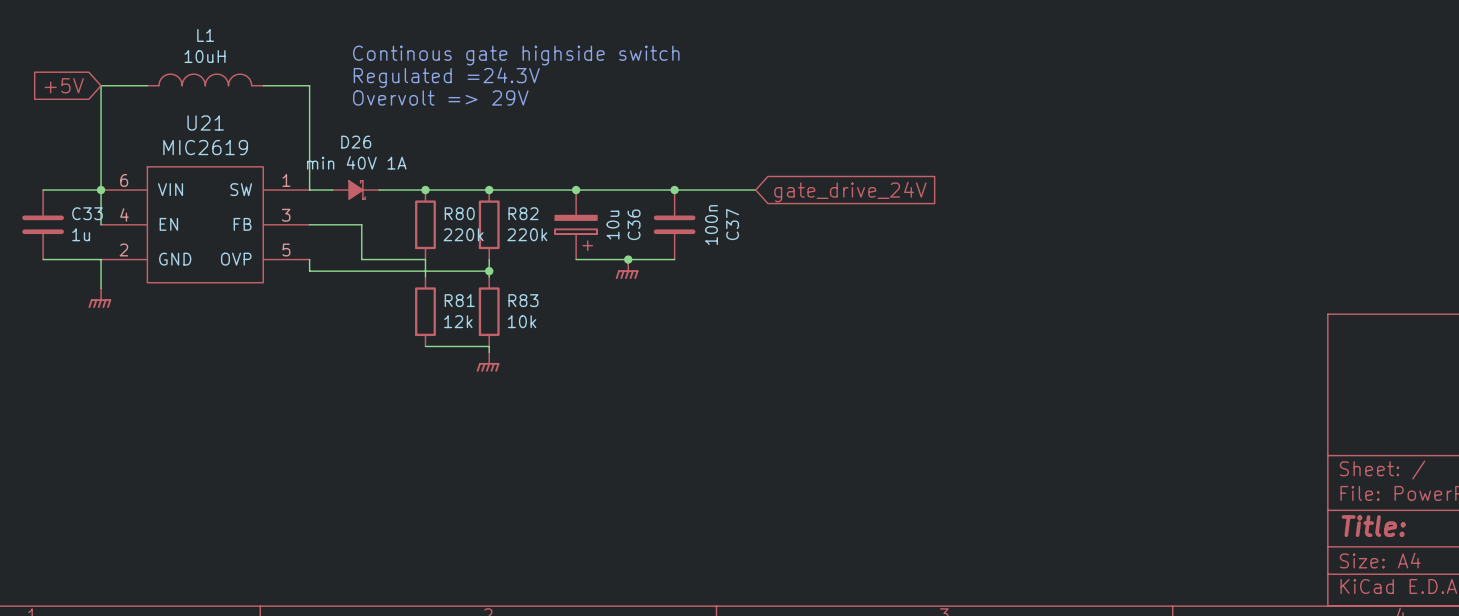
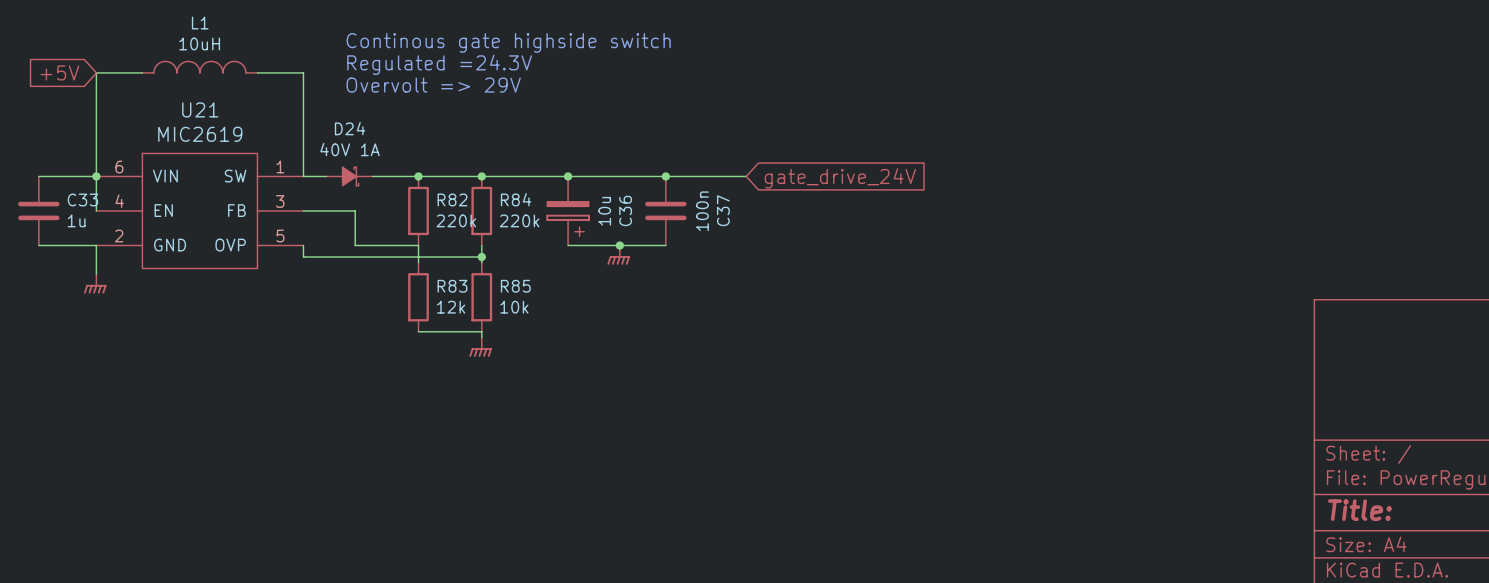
D26 name: D26 (356, 142) -> D24 (350, 128)
D26 value: min 40V 1A (356, 162) -> 40V 1A (350, 149)
R80 name: R80 (459, 213) -> R82 (452, 199)
R82 name: R82 (523, 213) -> R84 (516, 199)
R81 name: R81 (459, 300) -> R83 (452, 286)
R83 name: R83 (523, 300) -> R85 (515, 286)

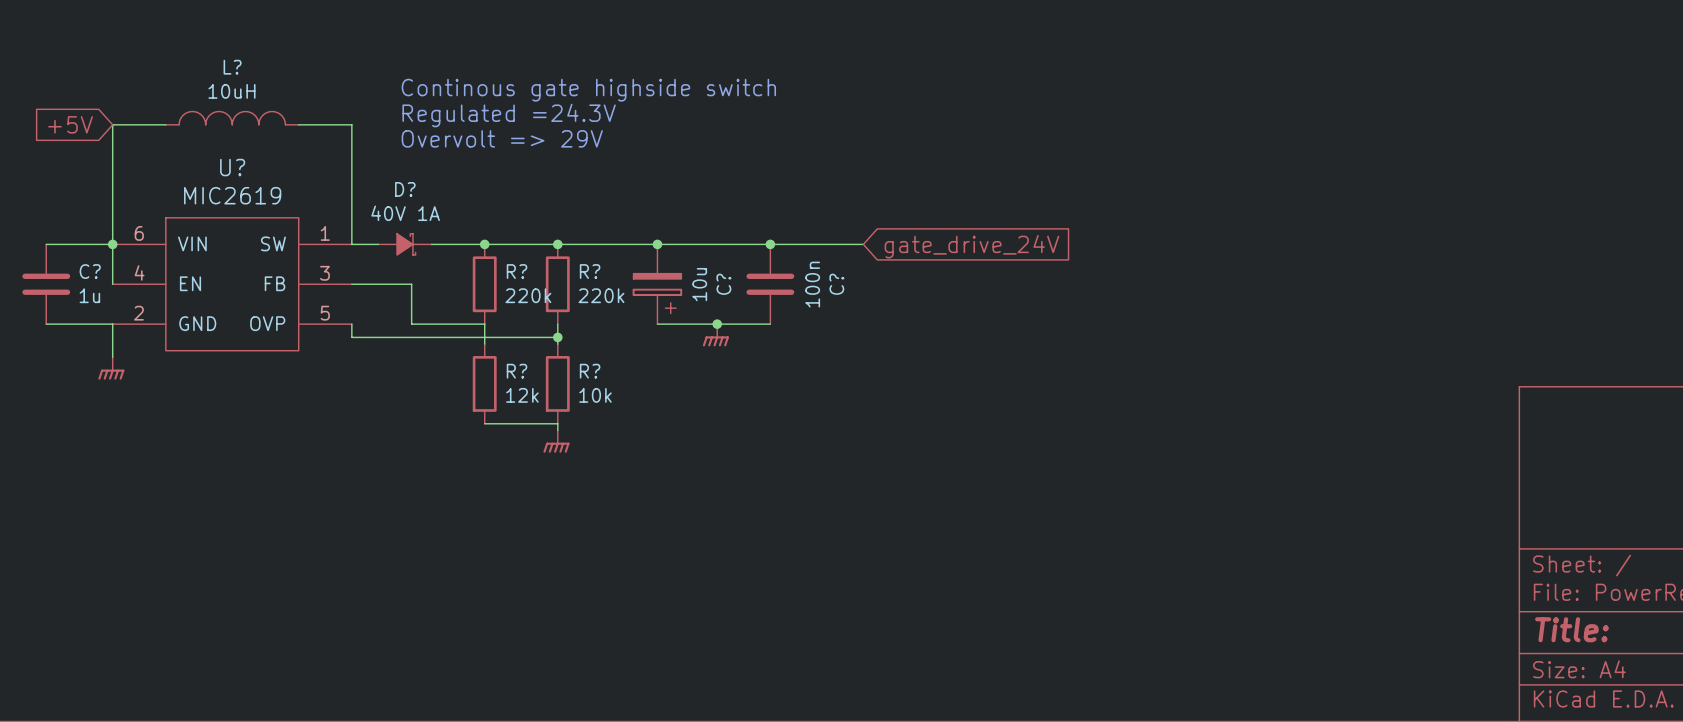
L1 name: L1 (200, 23) -> L? (232, 67)
U21 name: U21 (200, 109) -> U? (232, 167)
D24 name: D24 (350, 128) -> D? (405, 189)
C33 name: C33 (82, 199) -> C? (90, 271)
R82 name: R82 (452, 199) -> R? (517, 271)
R84 name: R84 (516, 199) -> R? (590, 271)
C36 name: C36 (625, 210) -> C? (723, 284)
C37 name: C37 (723, 210) -> C? (836, 284)
R83 name: R83 (452, 286) -> R? (517, 371)
R85 name: R85 (515, 286) -> R? (590, 371)

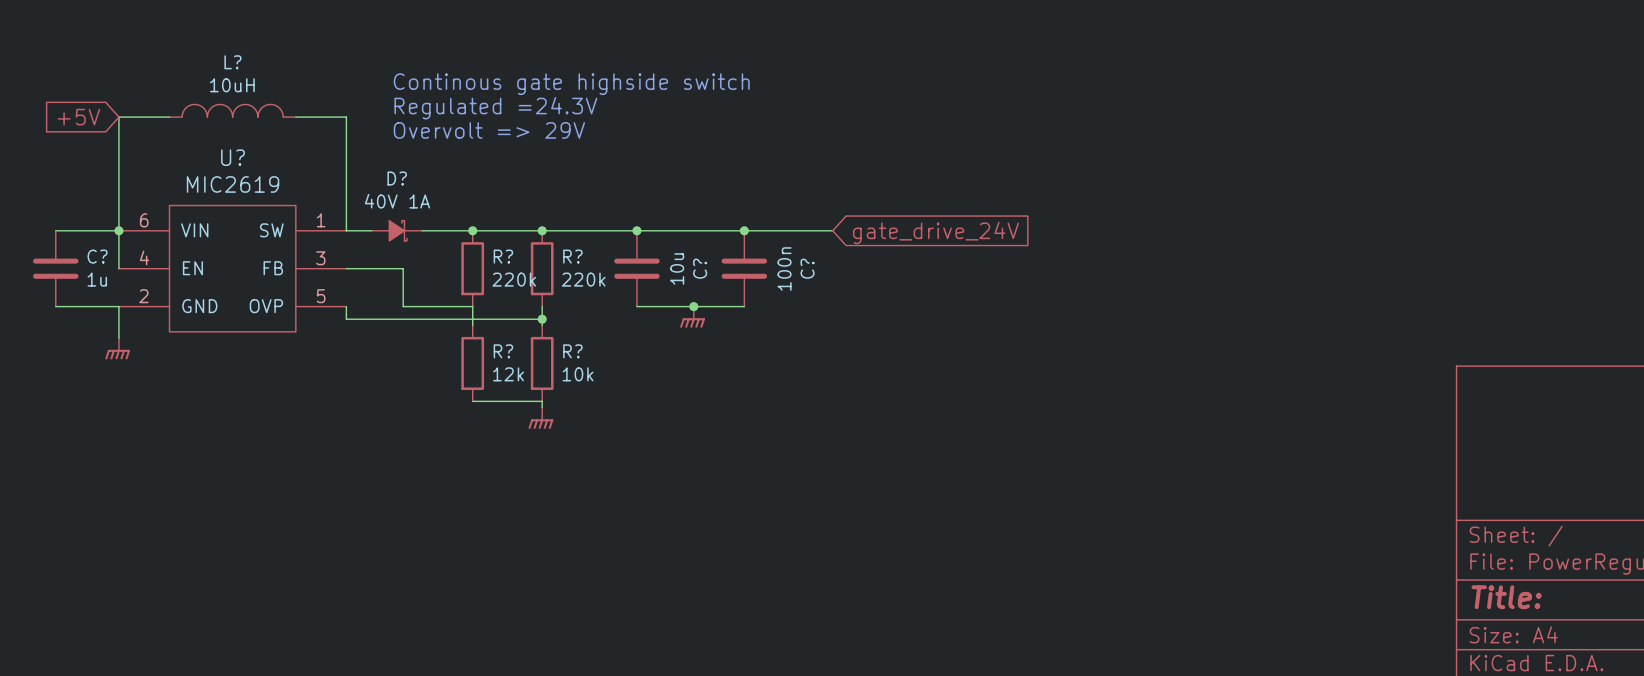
C? symbol: [633, 244, 682, 325] -> [614, 230, 660, 307]

